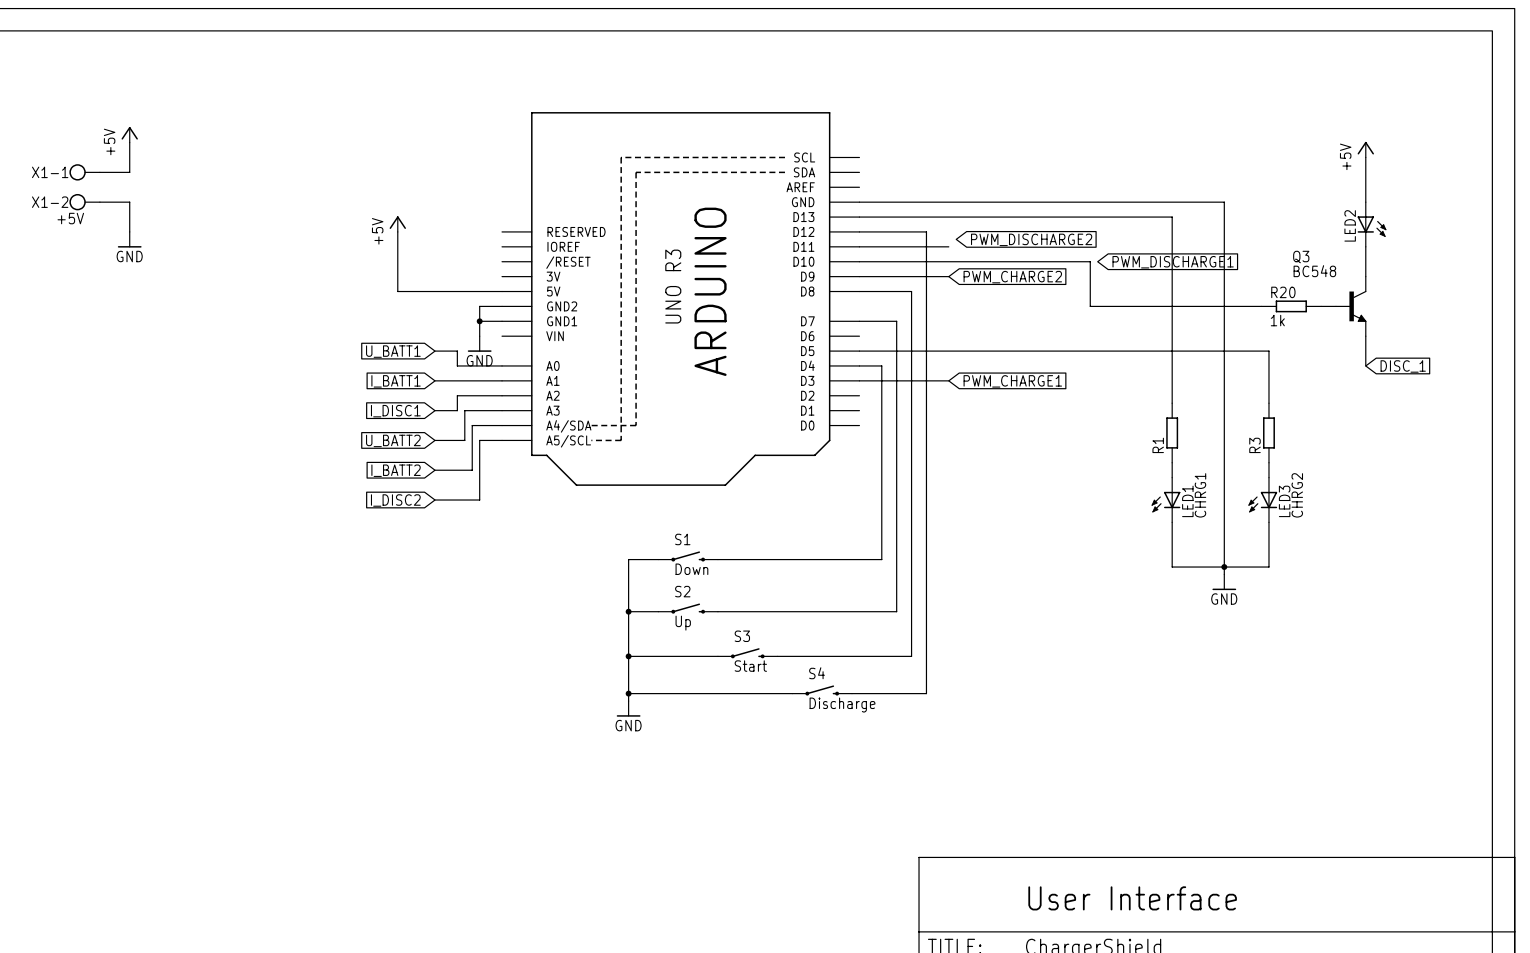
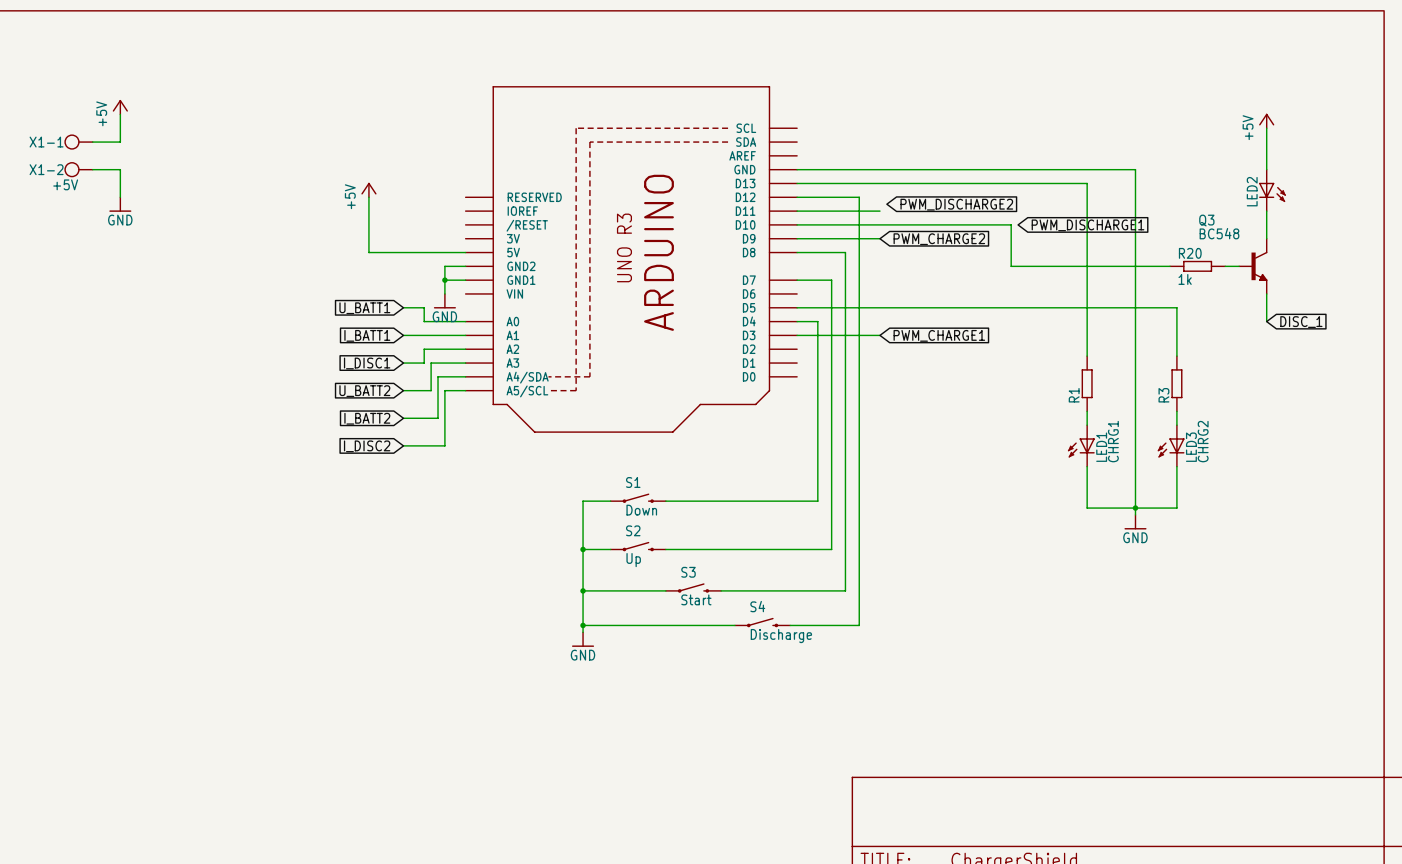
text: User Interface (1132, 898) -> none

